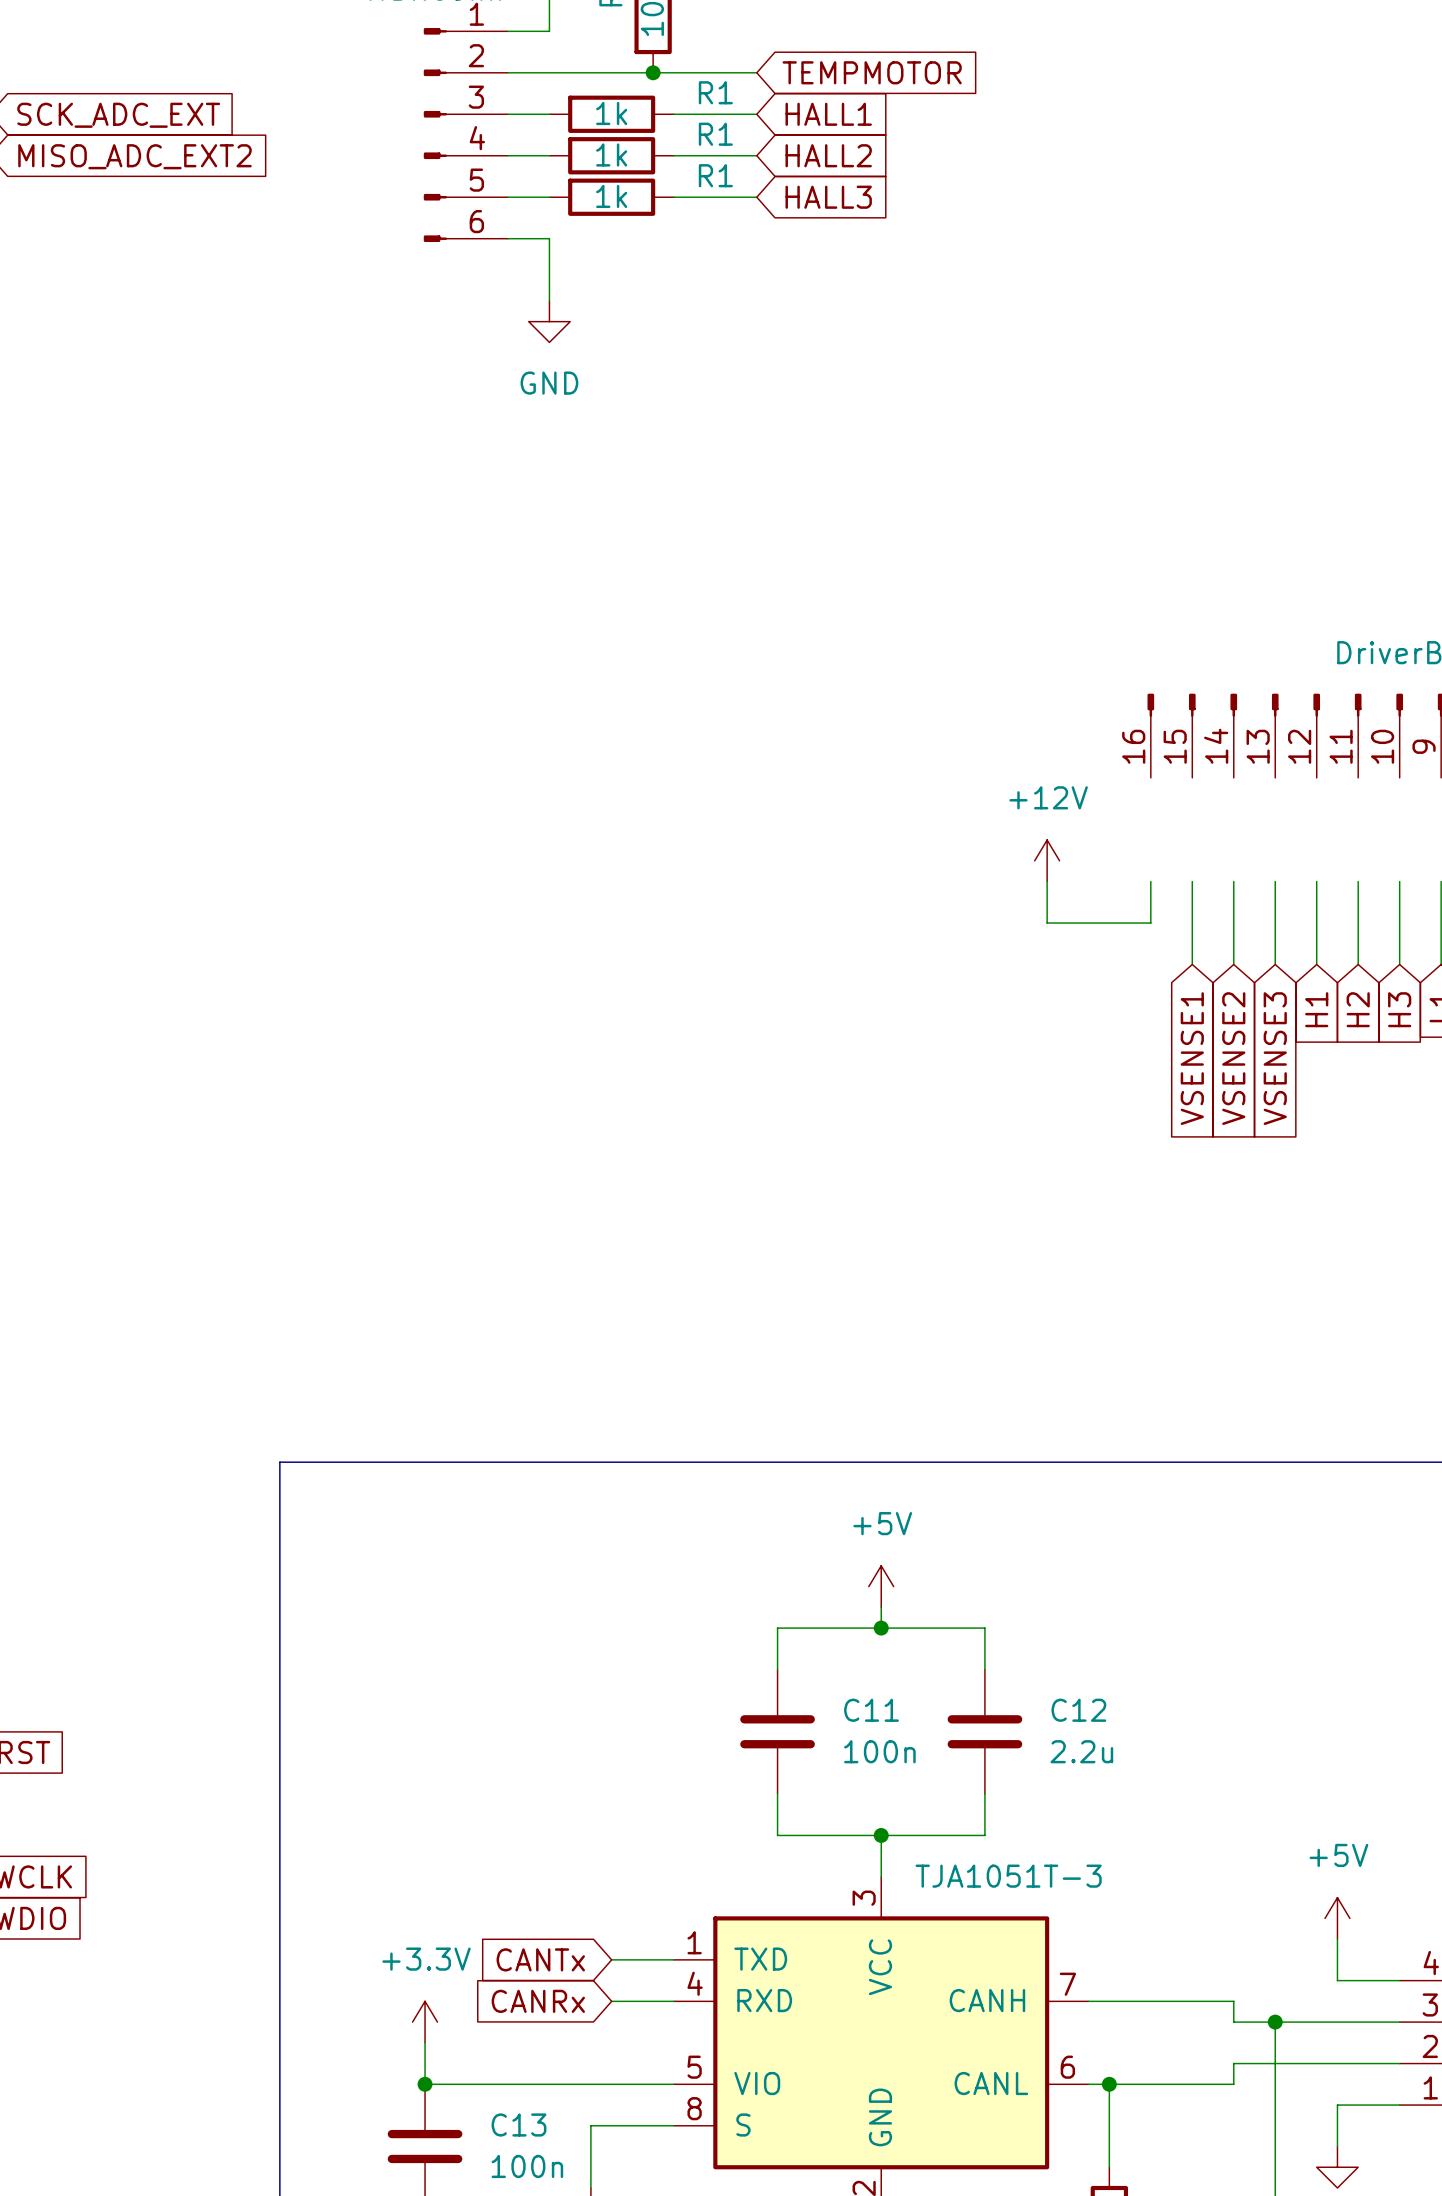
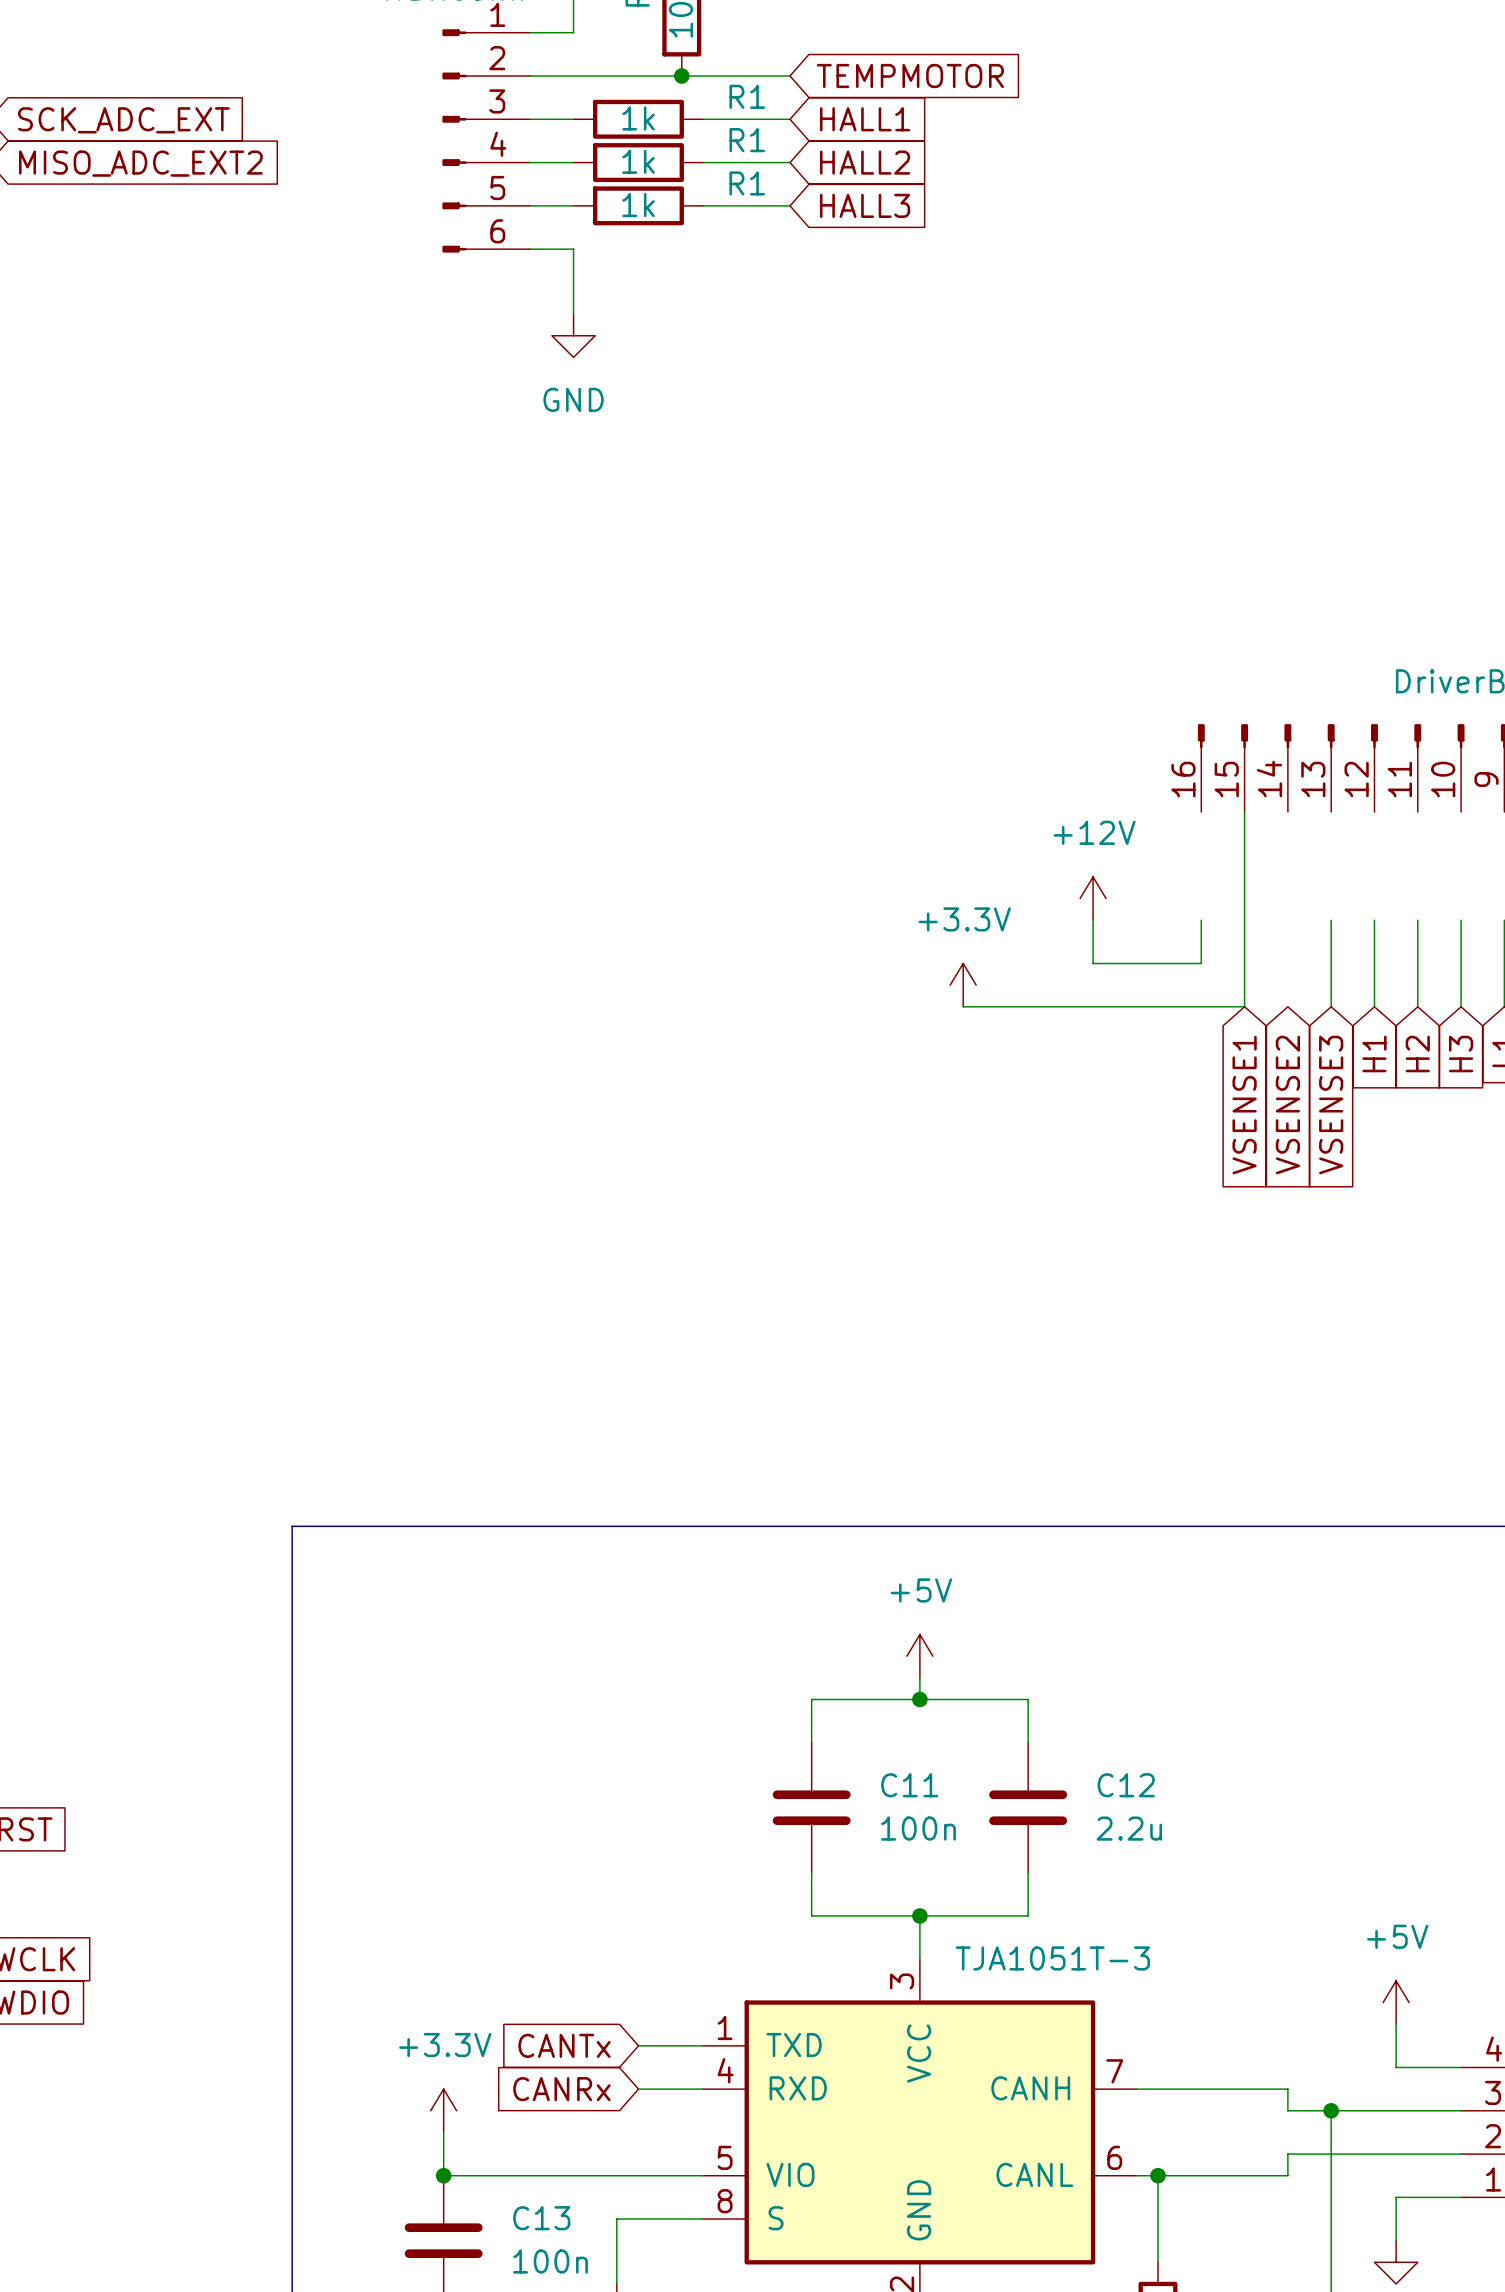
wire: none -> (1244, 811) (1244, 920)
wire: (1233, 881) (1233, 964) -> none
power symbol: none -> +3.3V (963, 985)
wire: none -> (963, 1006) (1244, 1006)

